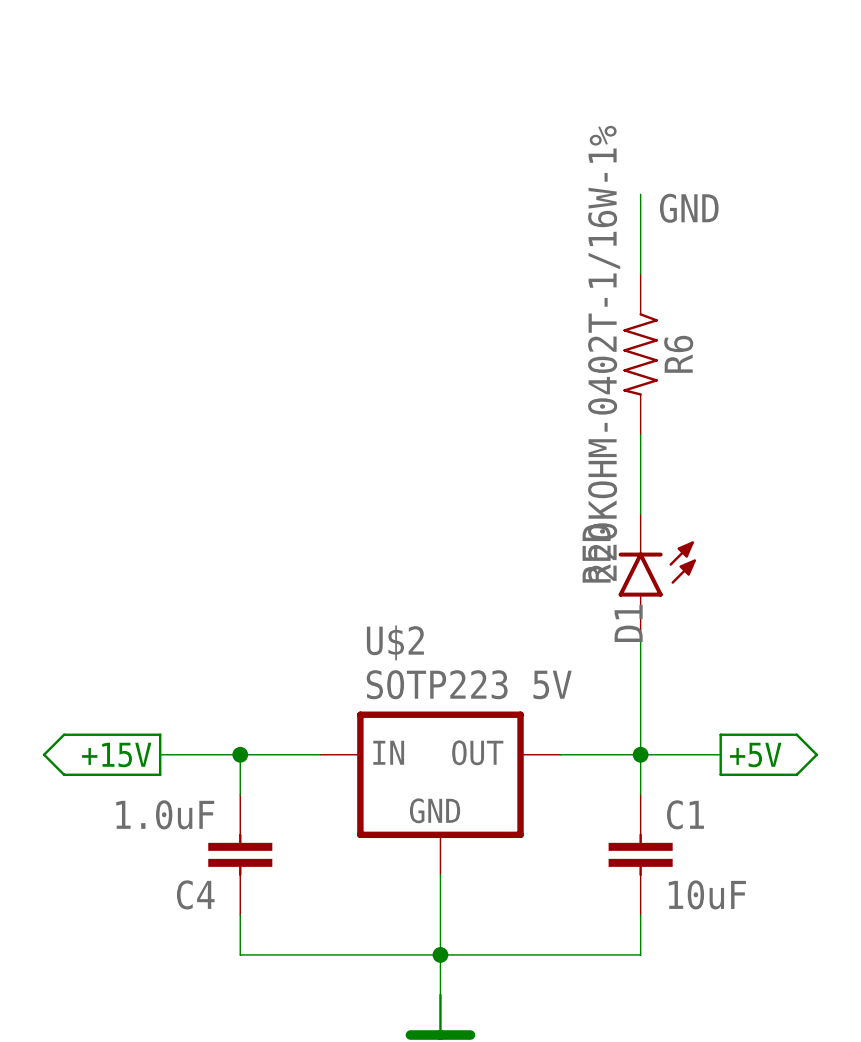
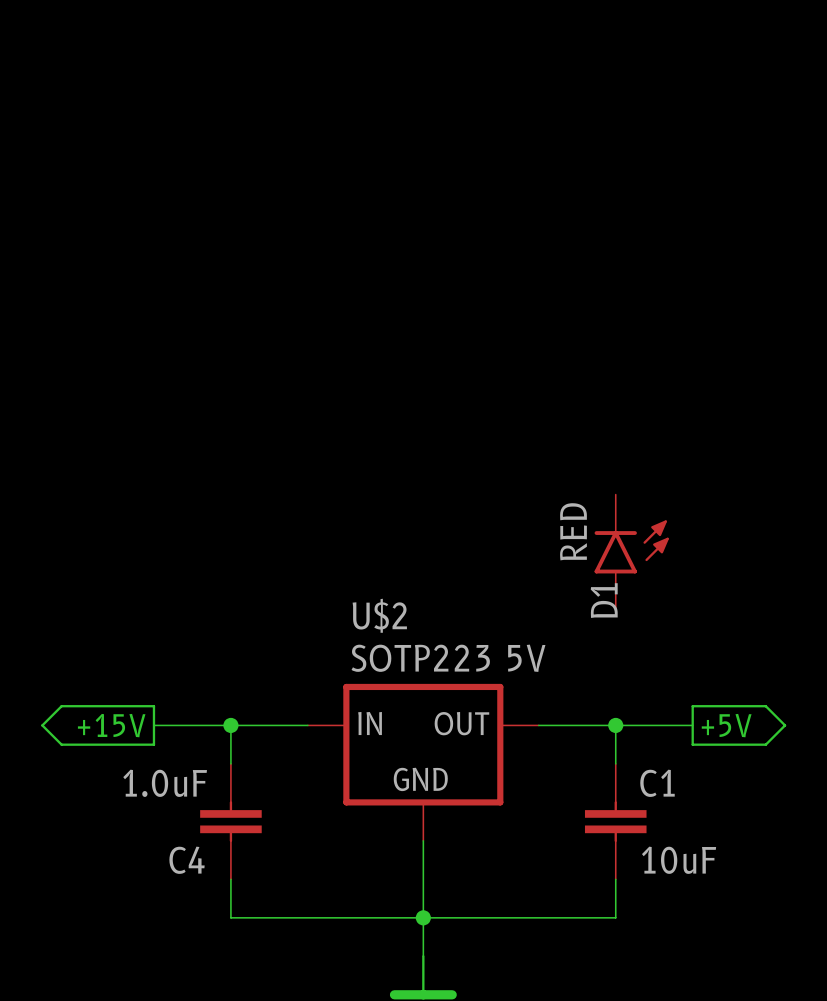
wire: (640, 194) (640, 274) -> none
label: GND (689, 208) -> none
R6: 220KOHM-0402T-1/16W-1% (640, 354) -> none
wire: (640, 434) (640, 514) -> none
wire: (640, 634) (640, 754) -> none

